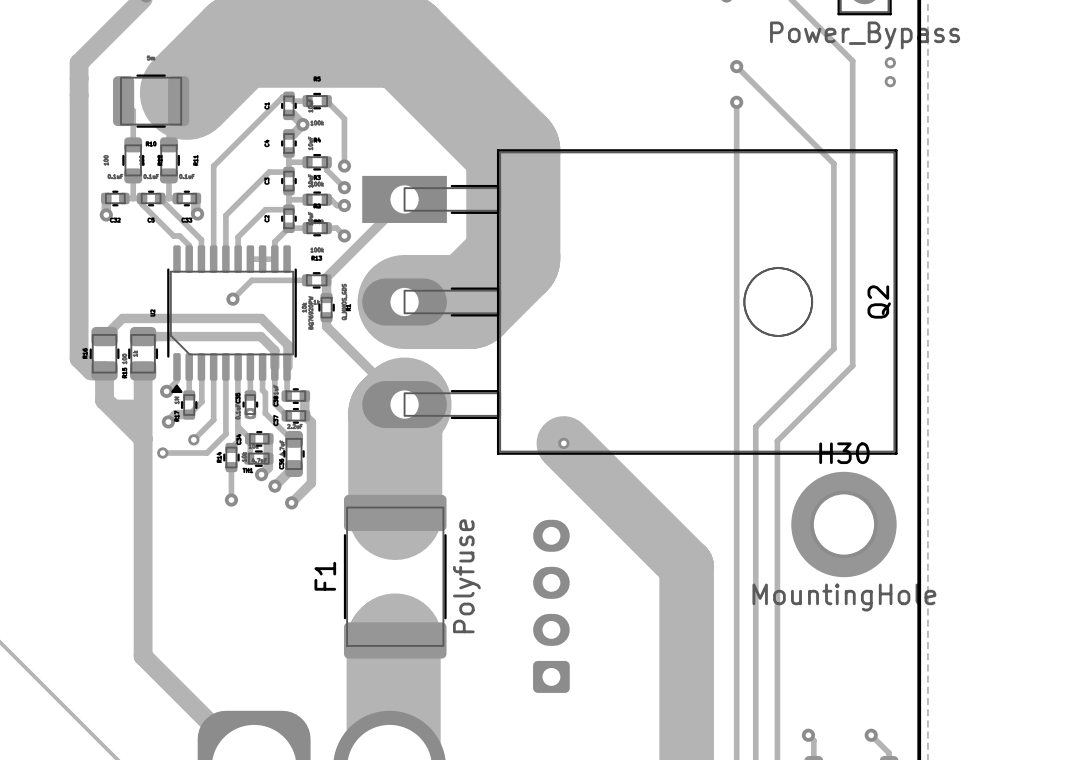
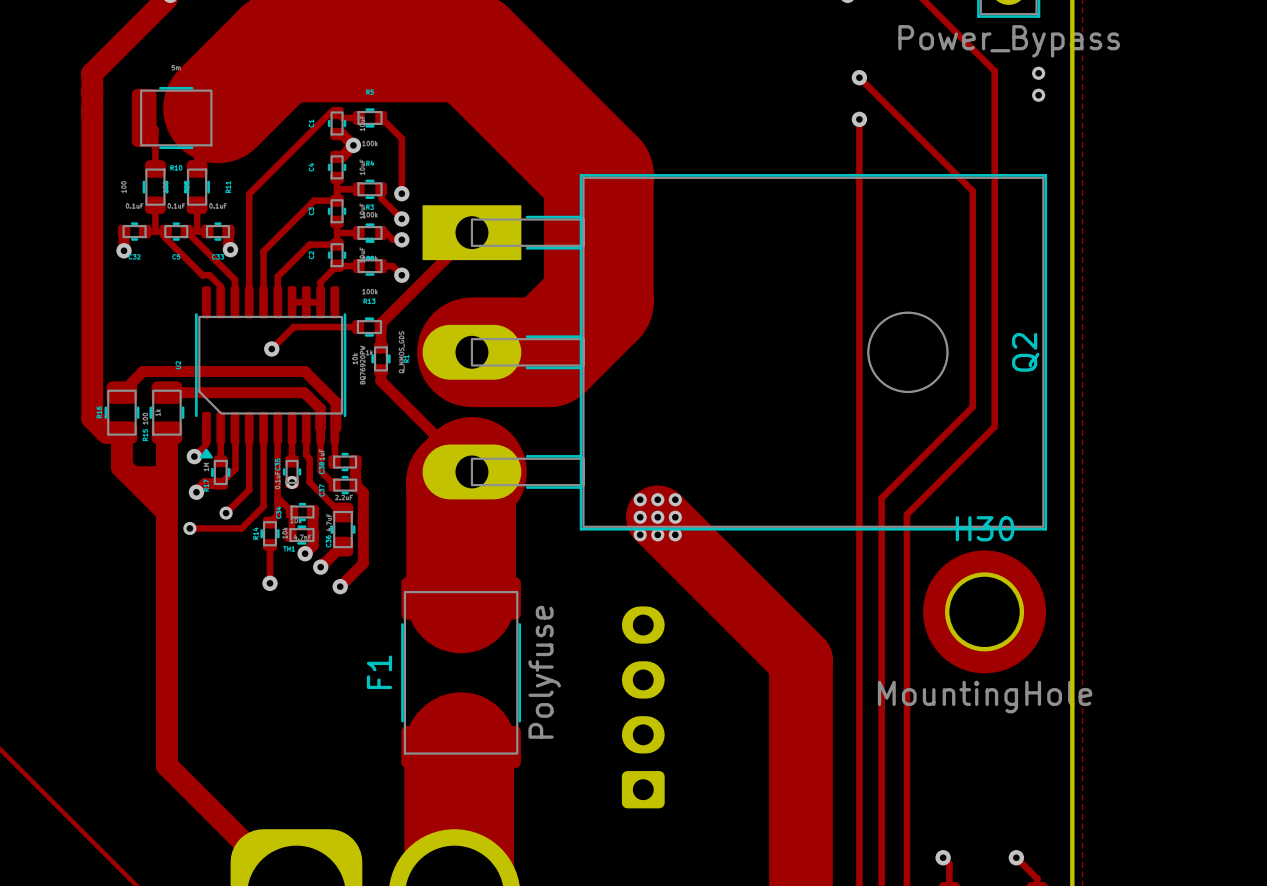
via: none -> (640, 499)
via: none -> (657, 499)
via: none -> (675, 499)
via: none -> (640, 517)
via: none -> (675, 517)
via: none -> (640, 534)
via: none -> (657, 534)
via: none -> (675, 534)

